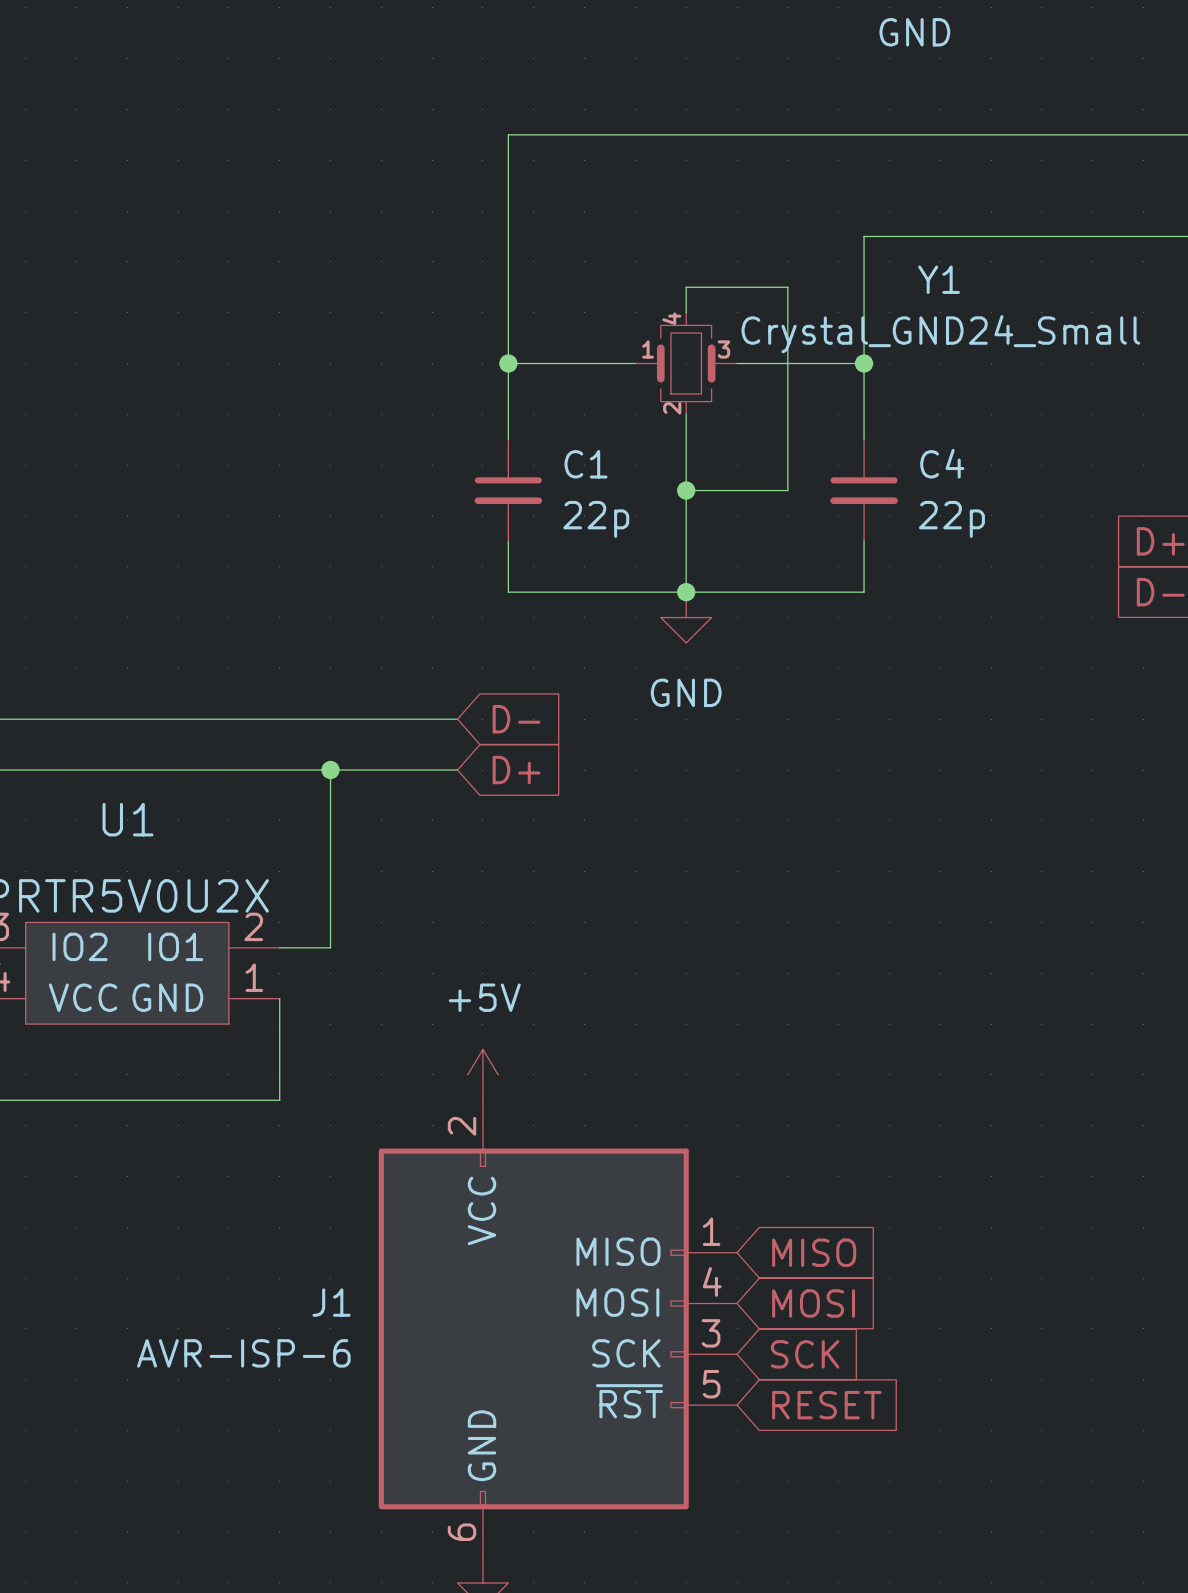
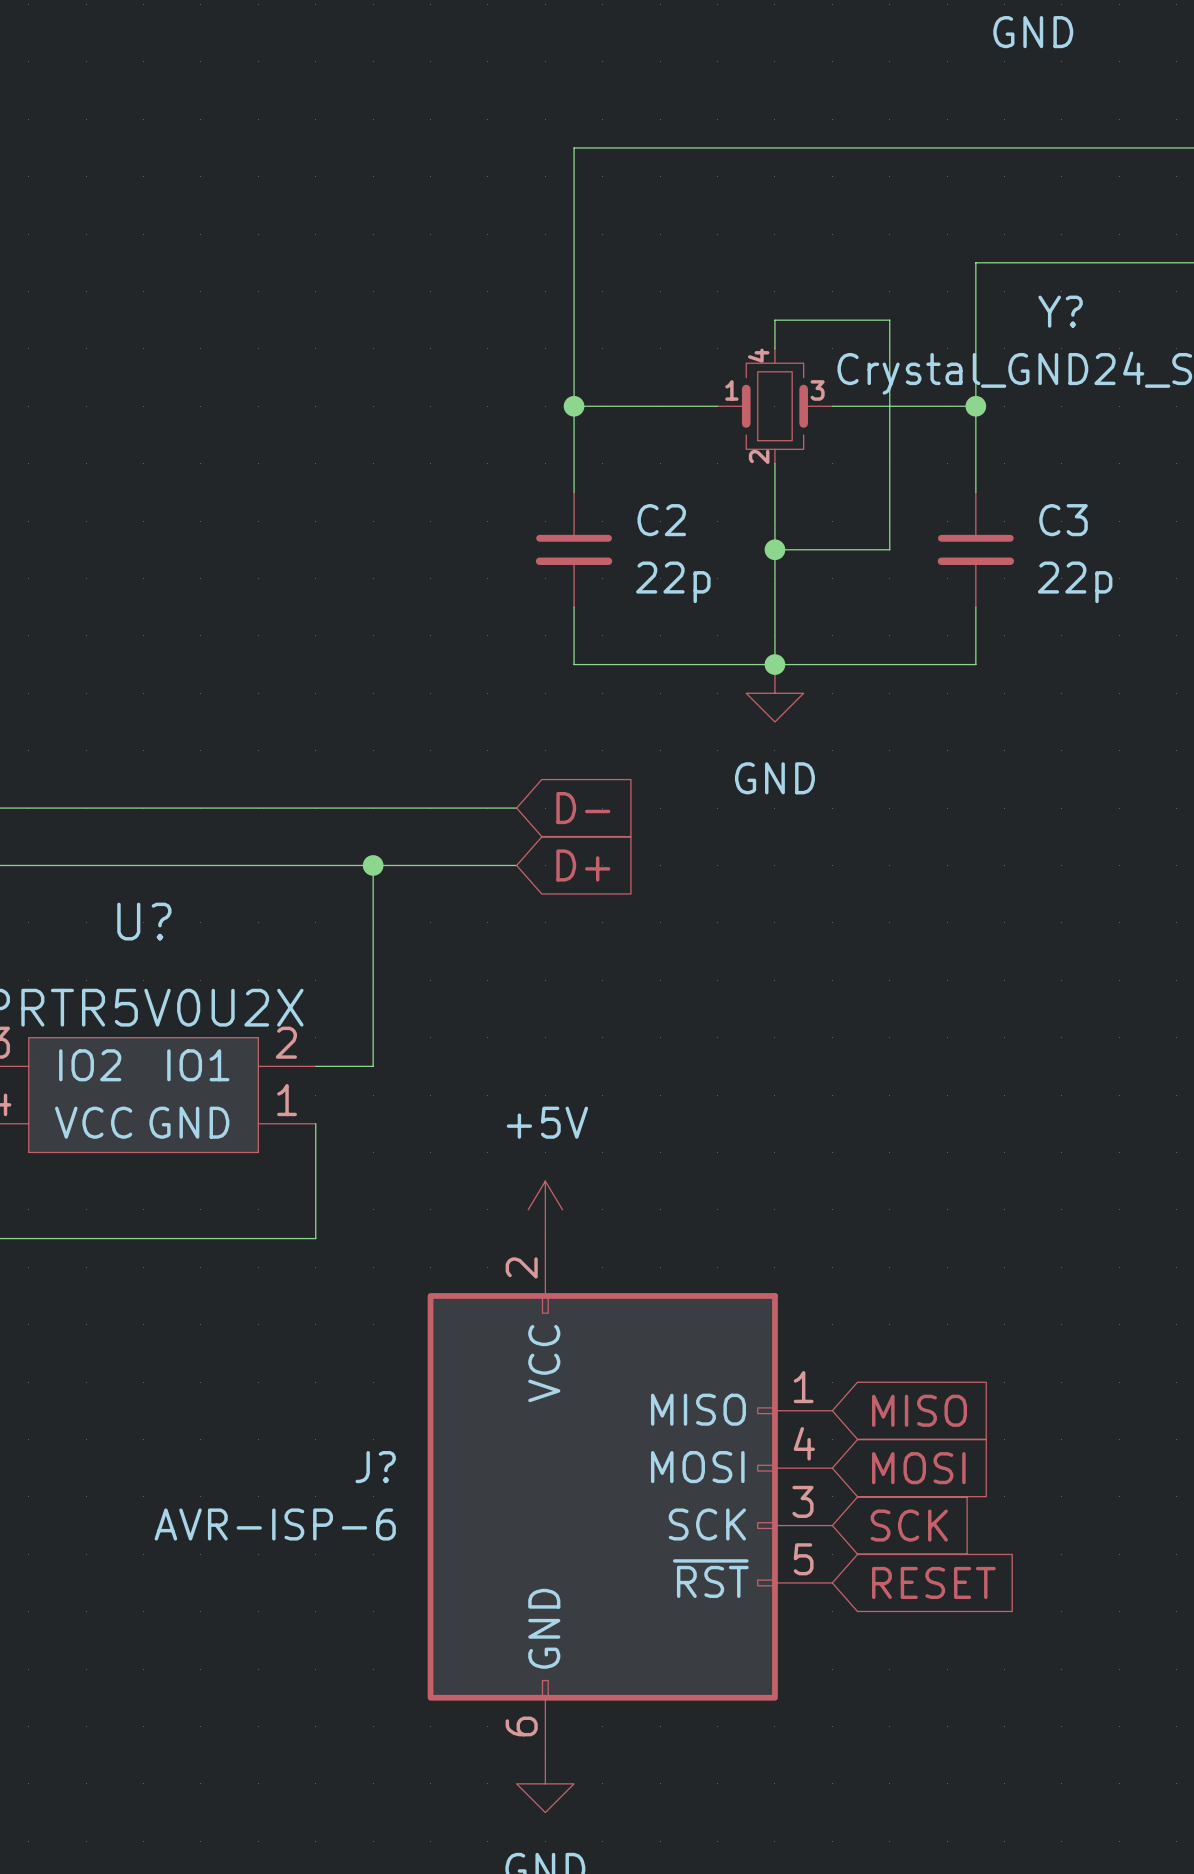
Y1 name: Y1 (939, 279) -> Y? (1060, 311)
C4 name: C4 (942, 463) -> C3 (1063, 520)
C1 name: C1 (585, 464) -> C2 (661, 520)
U1 name: U1 (128, 819) -> U? (144, 921)
J1 name: J1 (331, 1302) -> J? (375, 1467)

